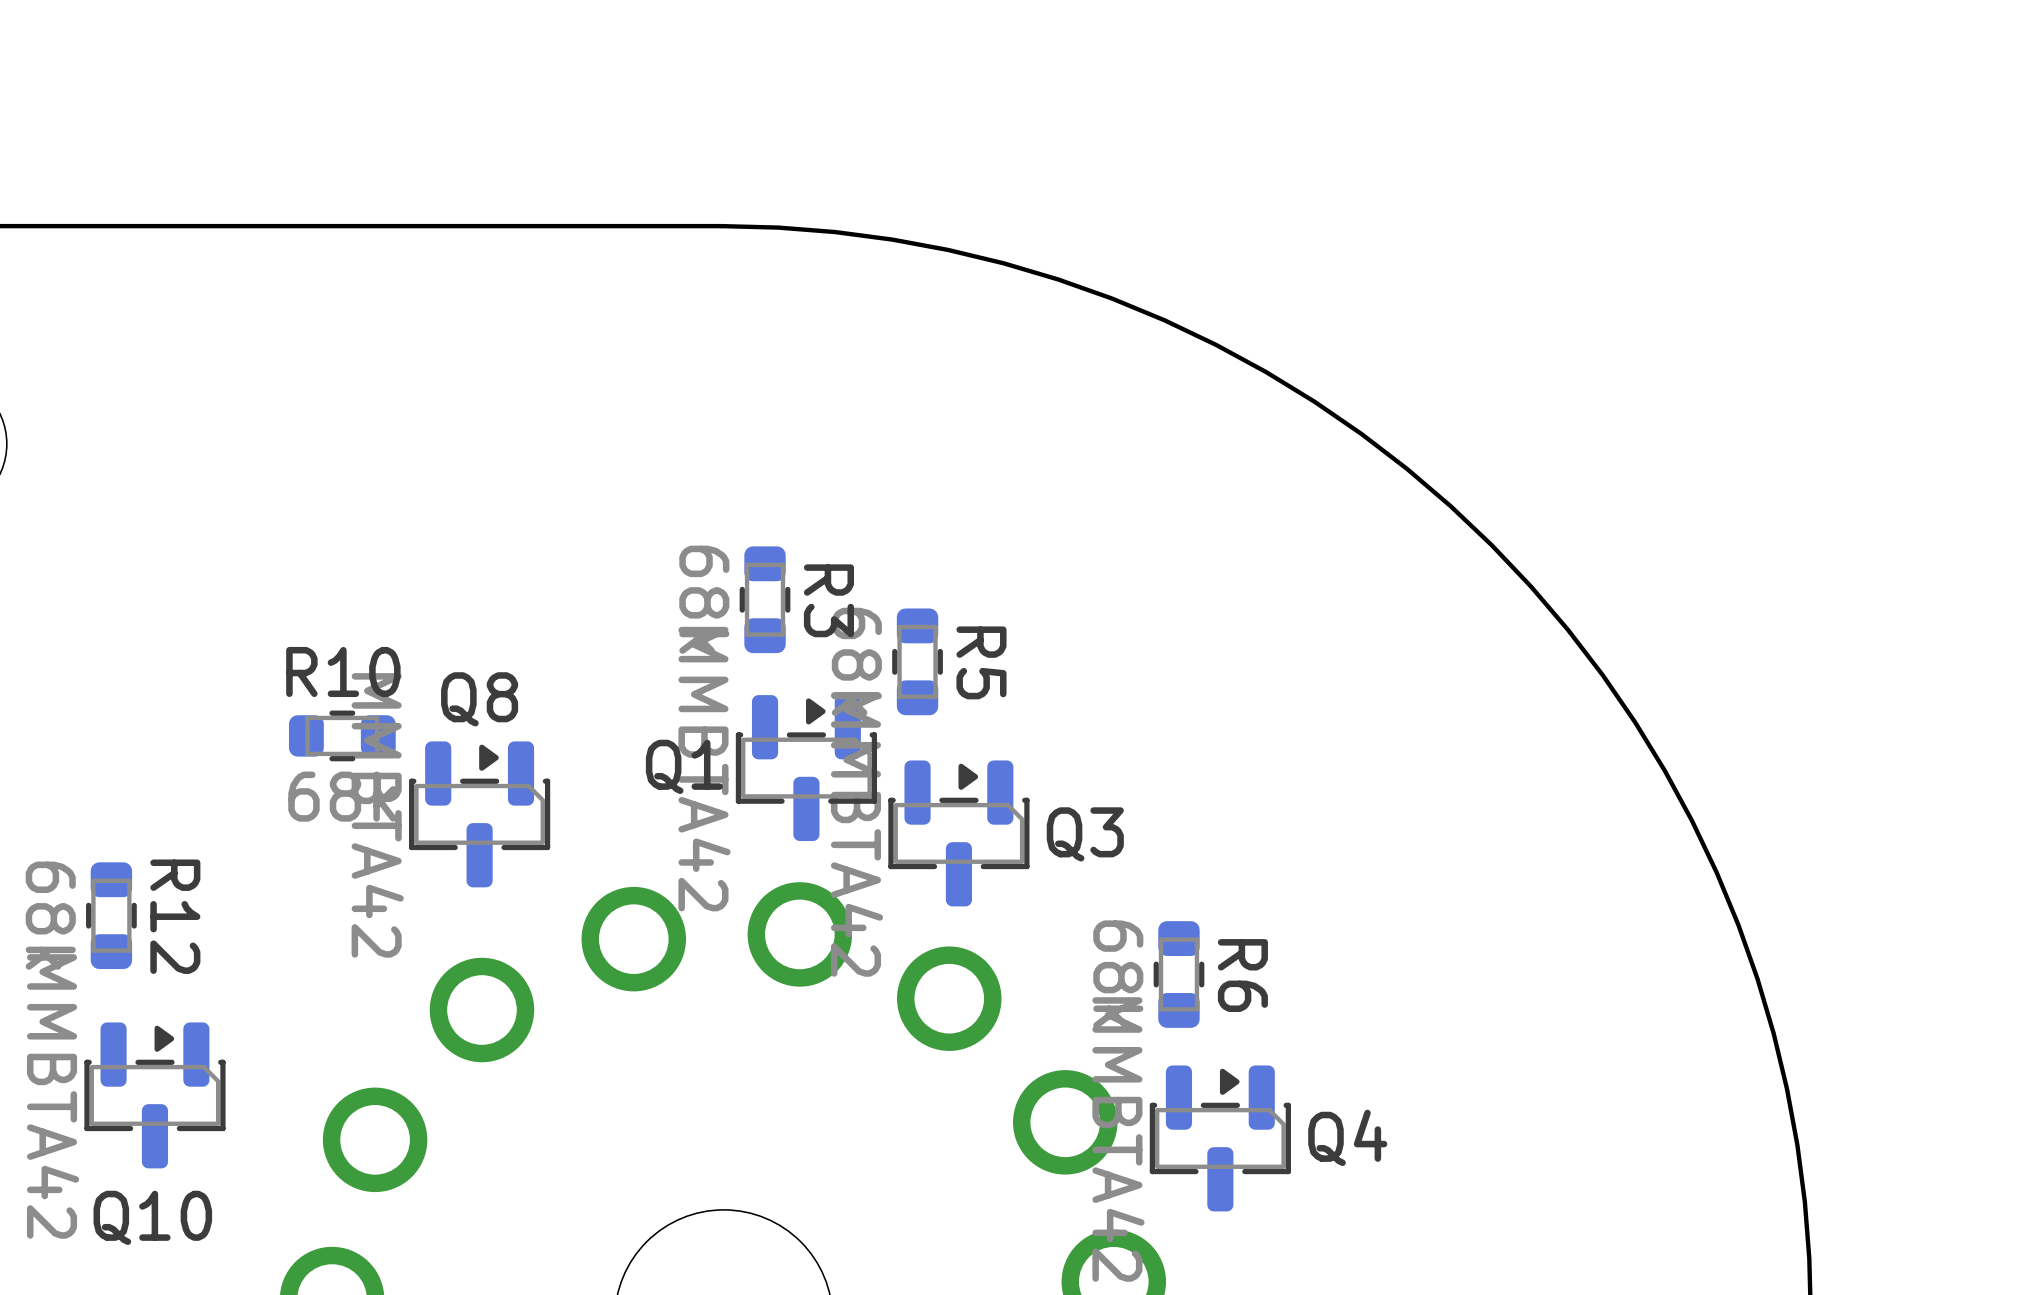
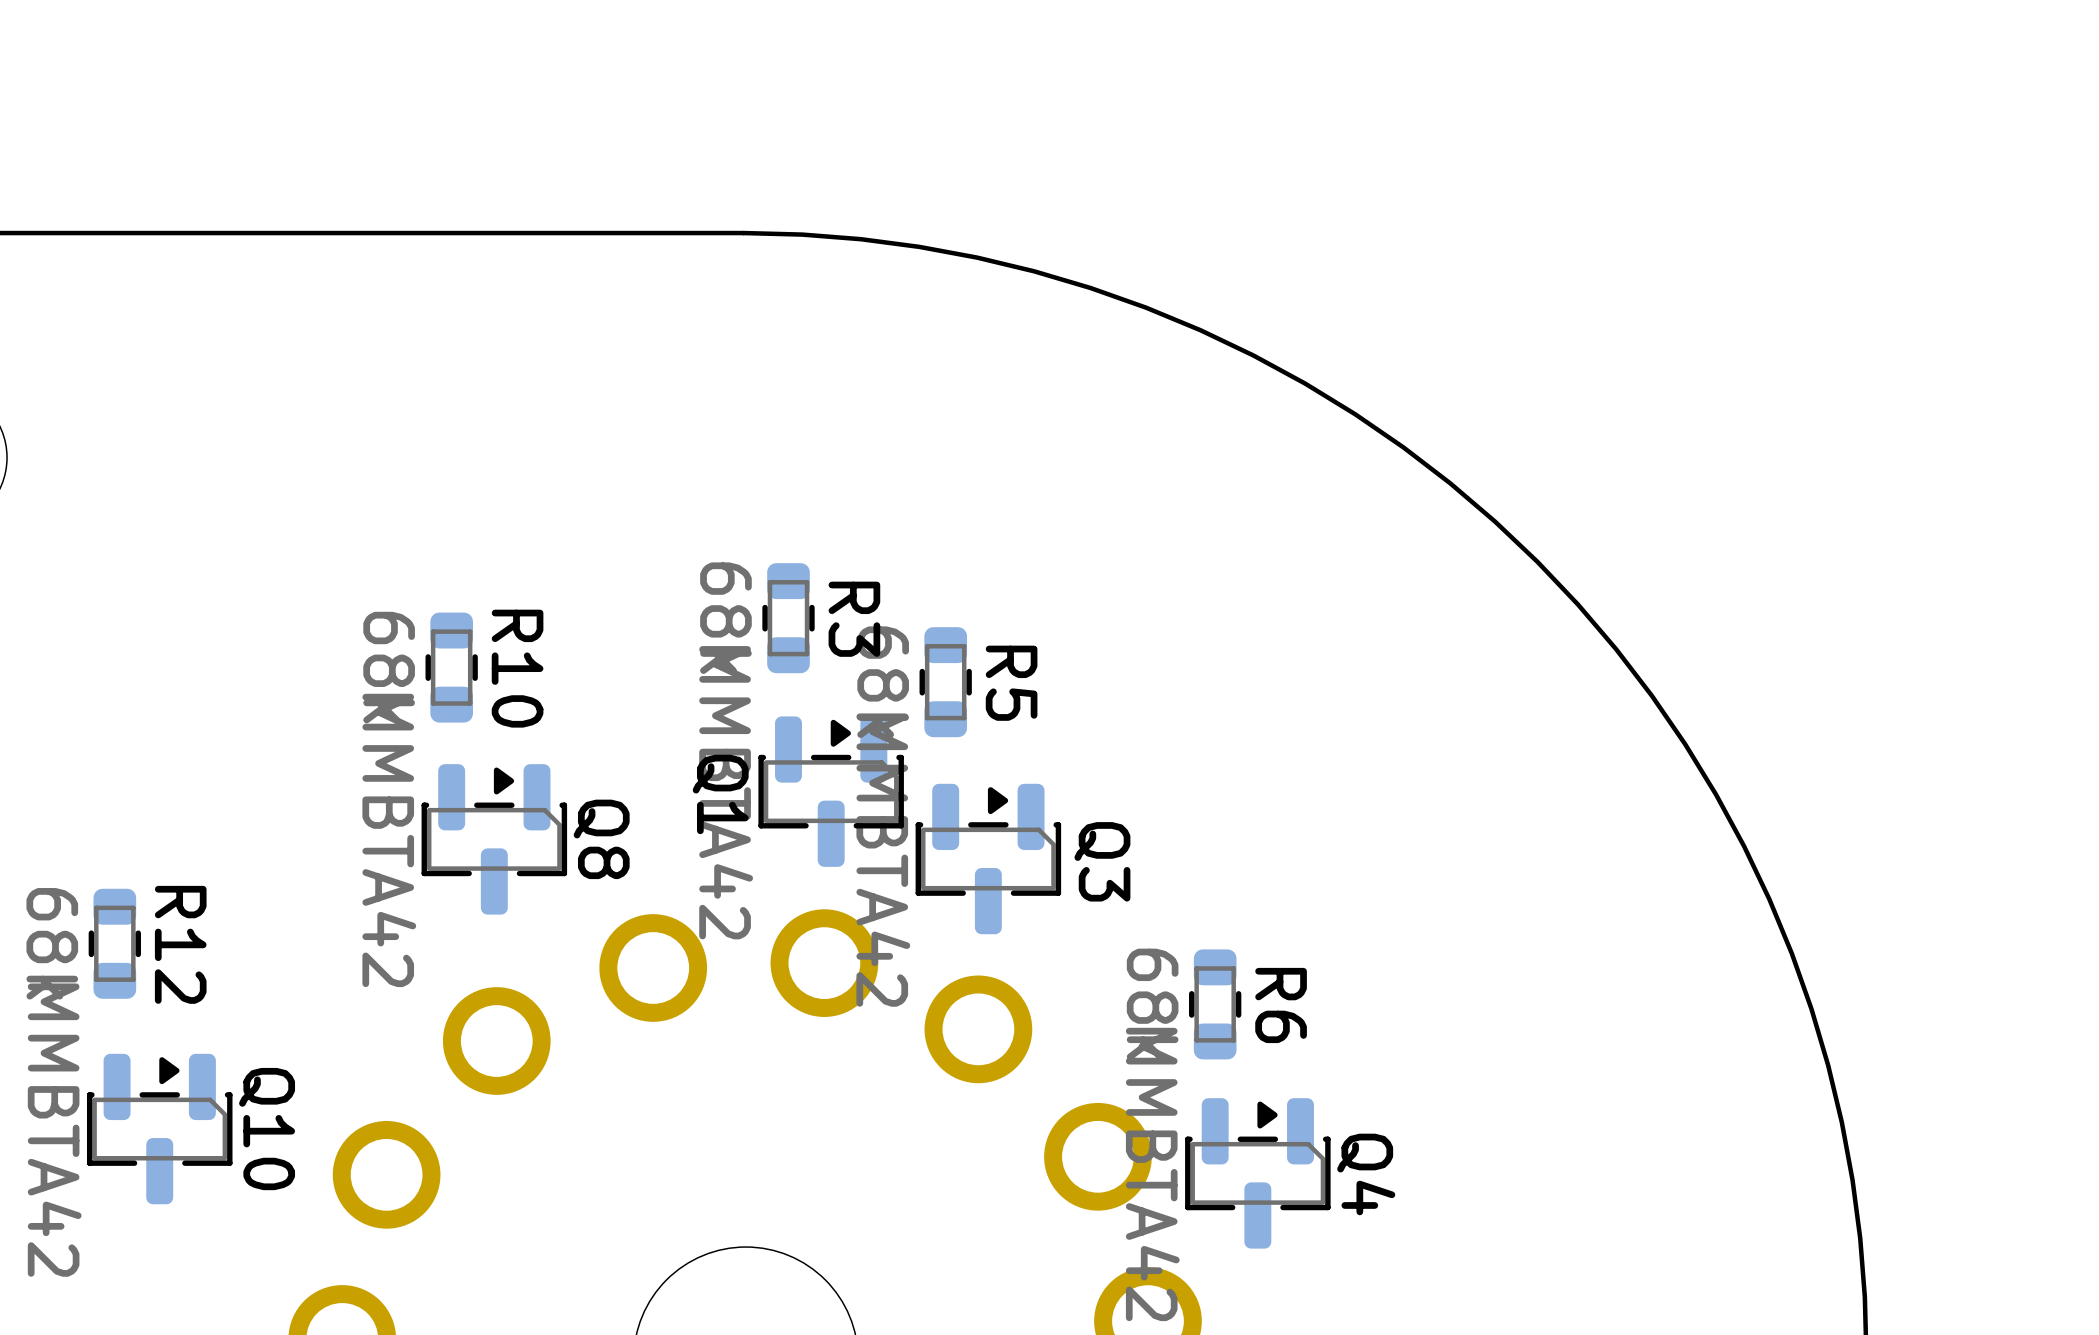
Q8 name rotation: 0° (479, 699) -> 90° clockwise (601, 839)
Q8 name position: Q8 (479, 699) -> Q8 (601, 839)
R10 rotation: 0° (342, 735) -> 90° clockwise (451, 667)
R10 position: (342, 735) -> (451, 667)
Q1 name rotation: 0° (684, 766) -> 90° clockwise (720, 794)
Q3 name rotation: 0° (1085, 834) -> 90° clockwise (1102, 861)
Q4 name rotation: 0° (1347, 1137) -> 90° clockwise (1366, 1174)
Q10 name rotation: 0° (152, 1217) -> 90° clockwise (267, 1129)
Q10 name position: Q10 (152, 1217) -> Q10 (267, 1129)

